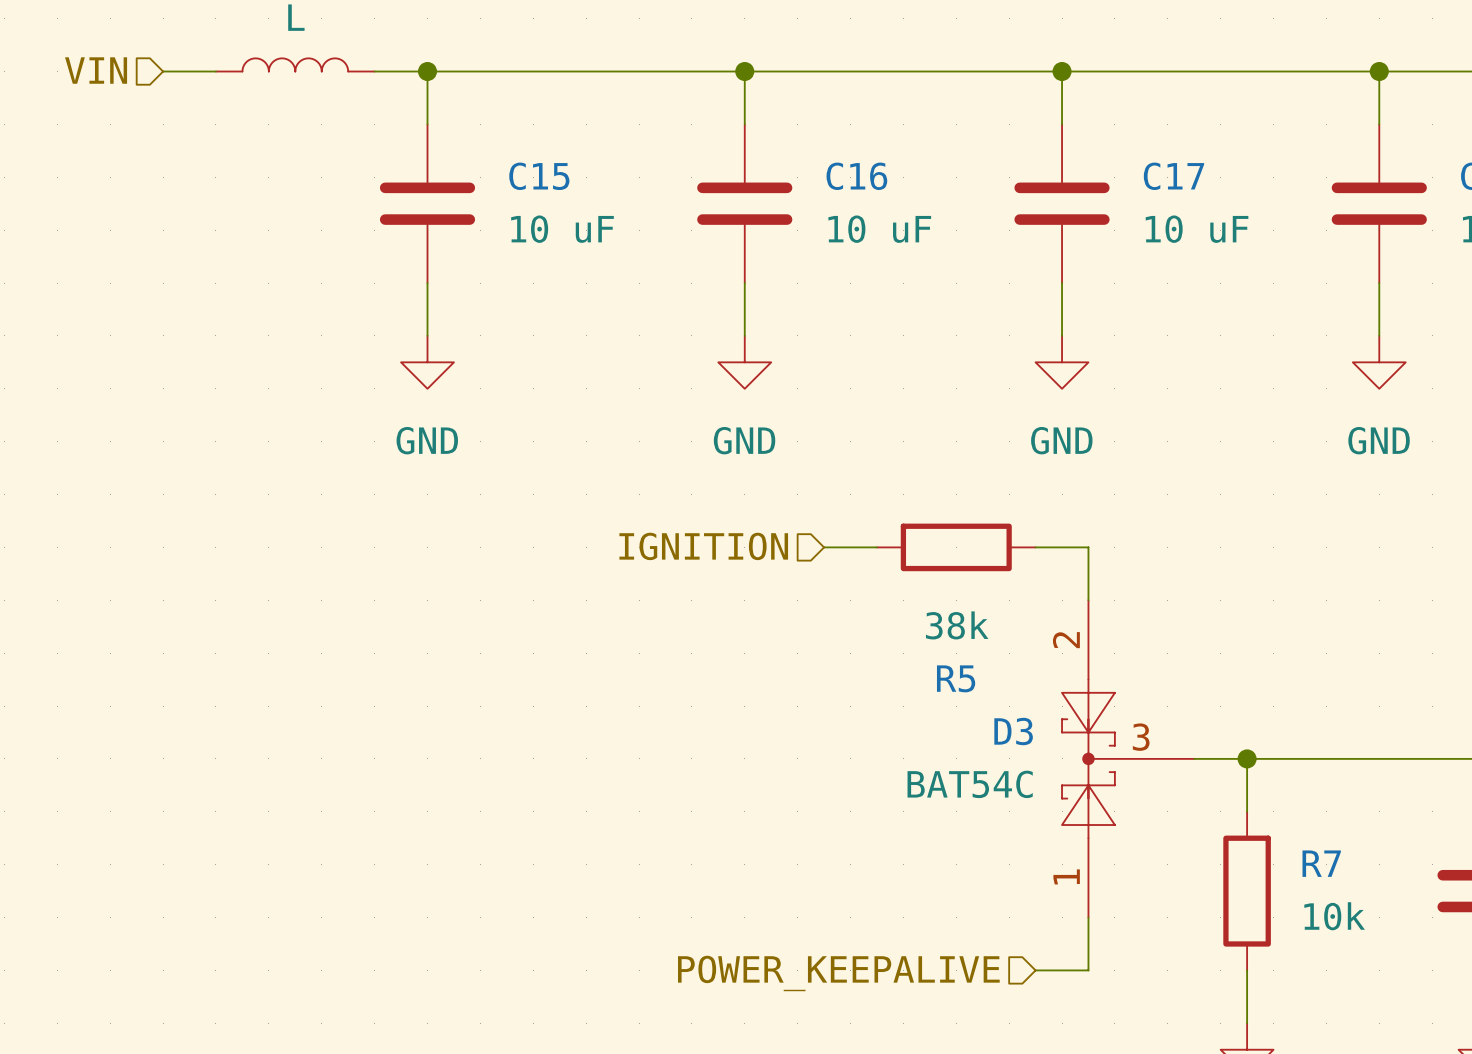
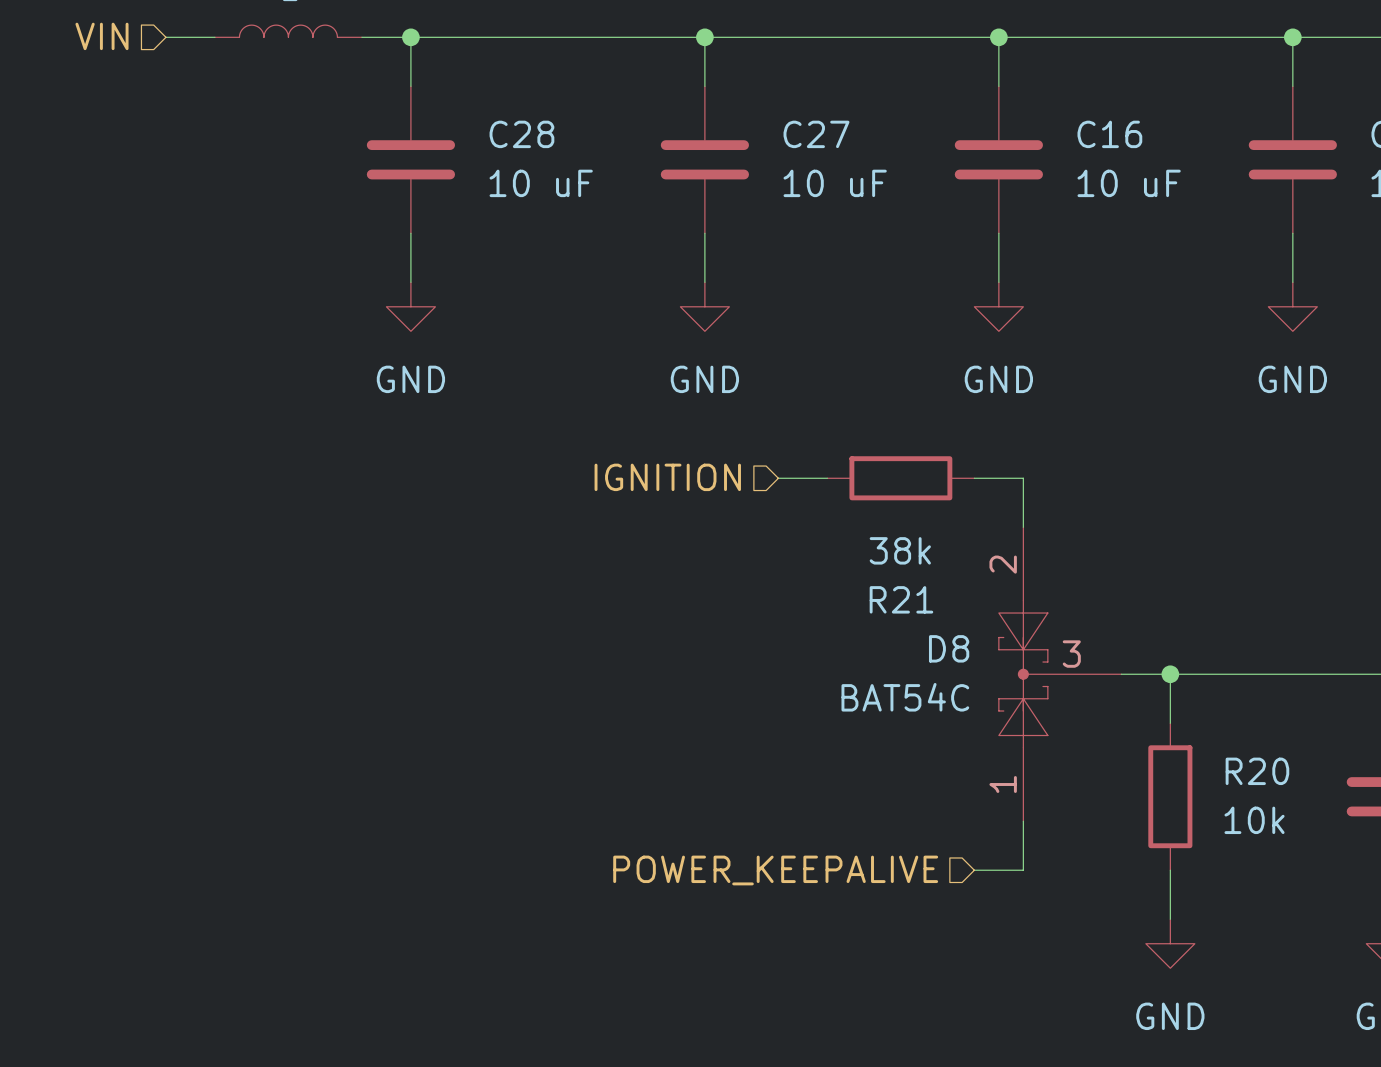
C15 name: C15 (539, 176) -> C28 (521, 134)
C16 name: C16 (856, 176) -> C27 (816, 134)
C17 name: C17 (1173, 176) -> C16 (1109, 134)
R5 name: R5 (956, 678) -> R21 (901, 599)
D3 name: D3 (1013, 731) -> D8 (949, 648)
R7 name: R7 (1321, 863) -> R20 (1257, 771)

